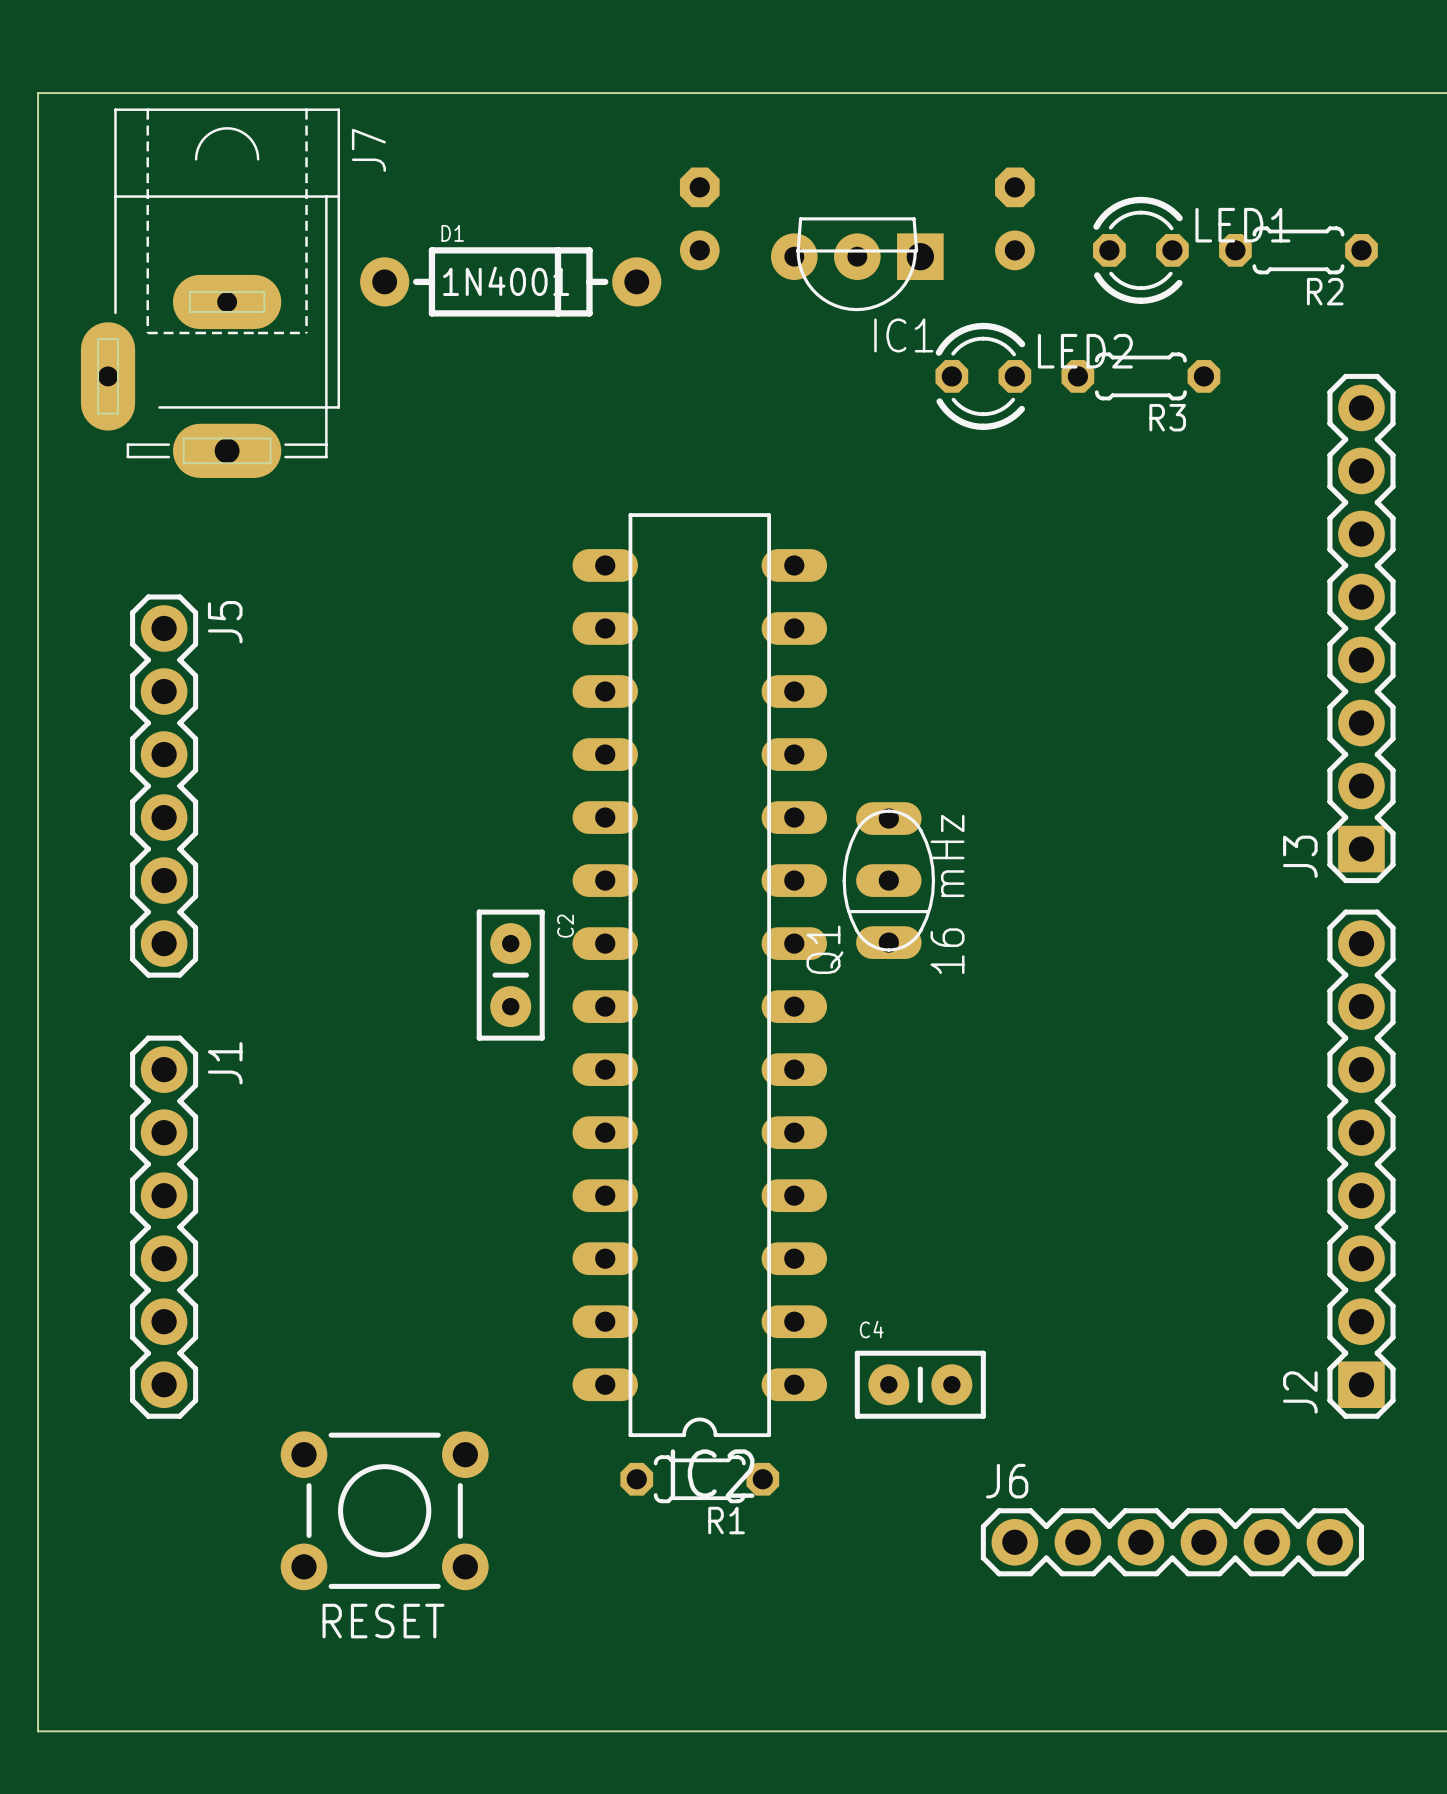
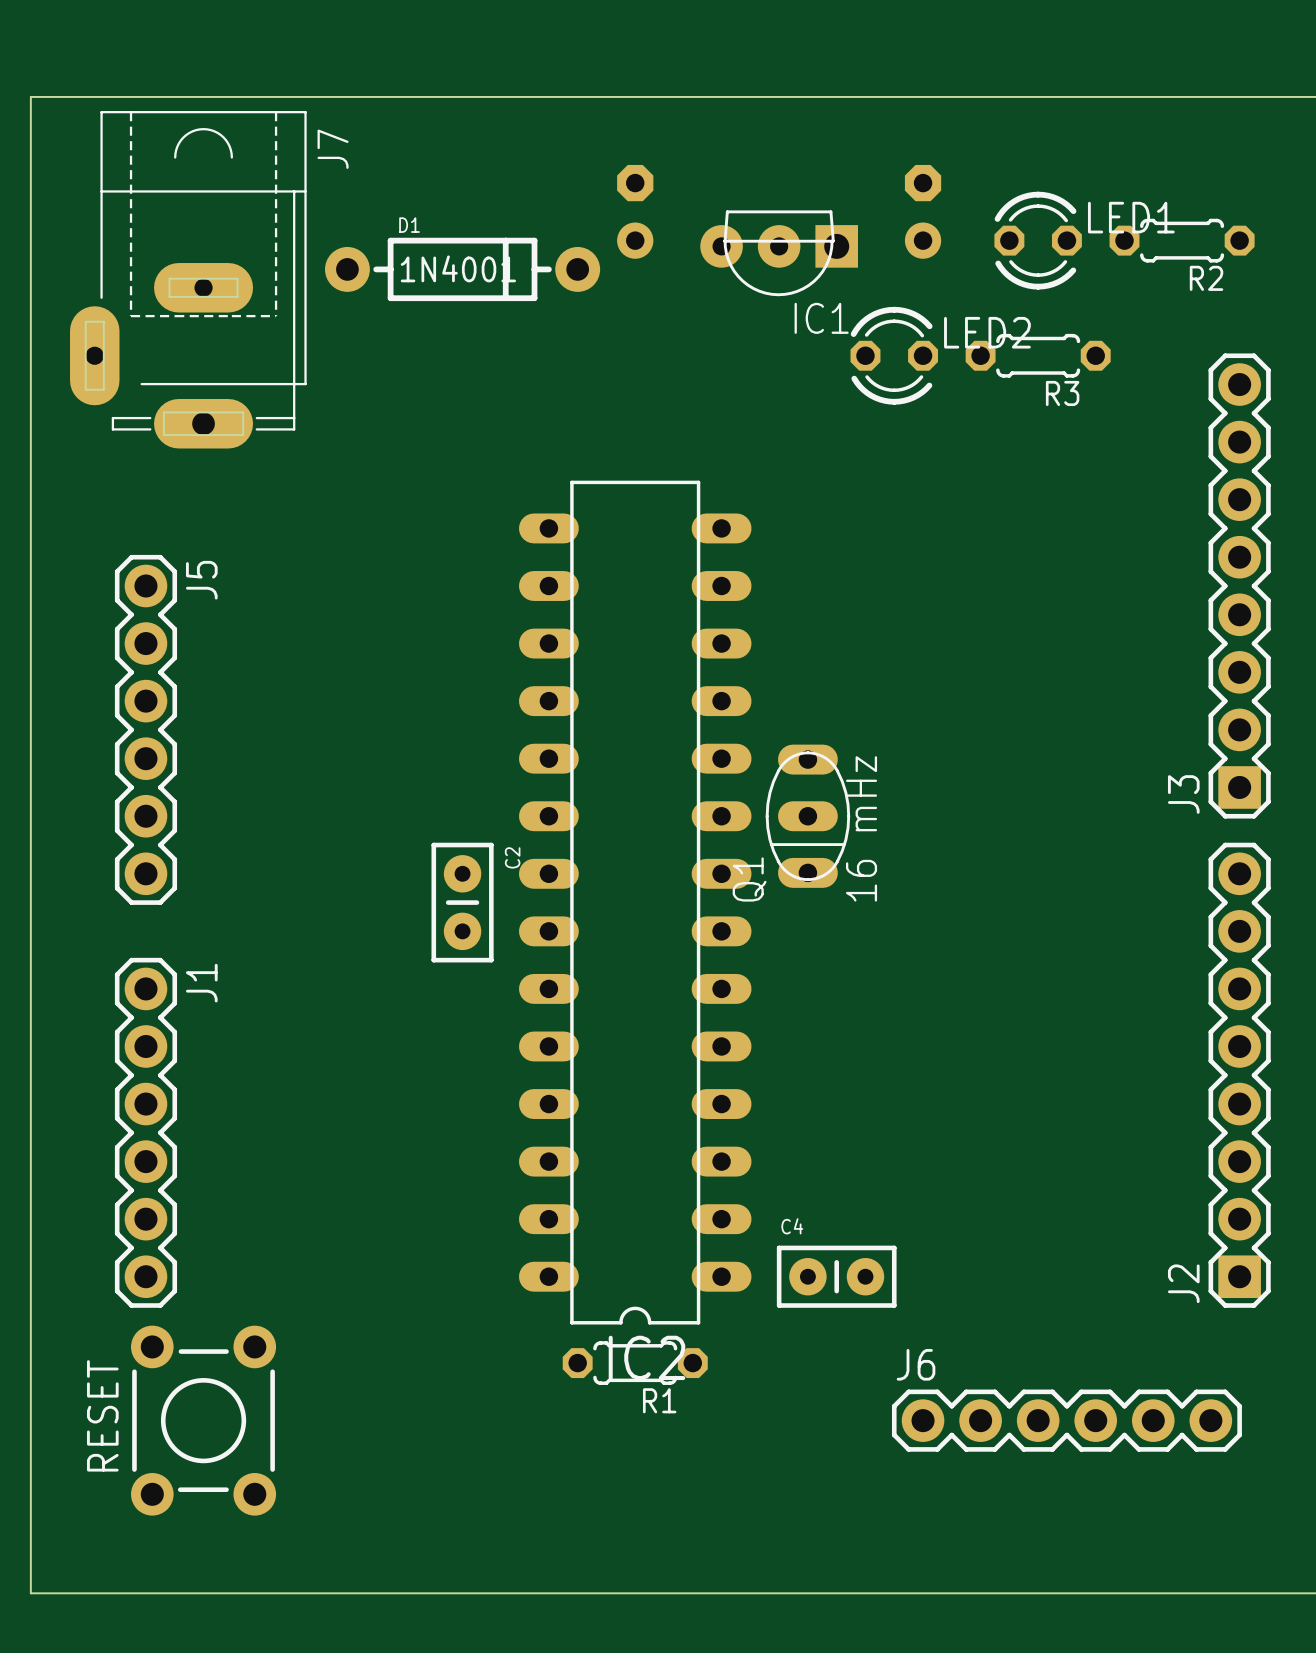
RESET rotation: 0° (384, 1510) -> 90° clockwise (203, 1420)
RESET position: (384, 1510) -> (203, 1420)

